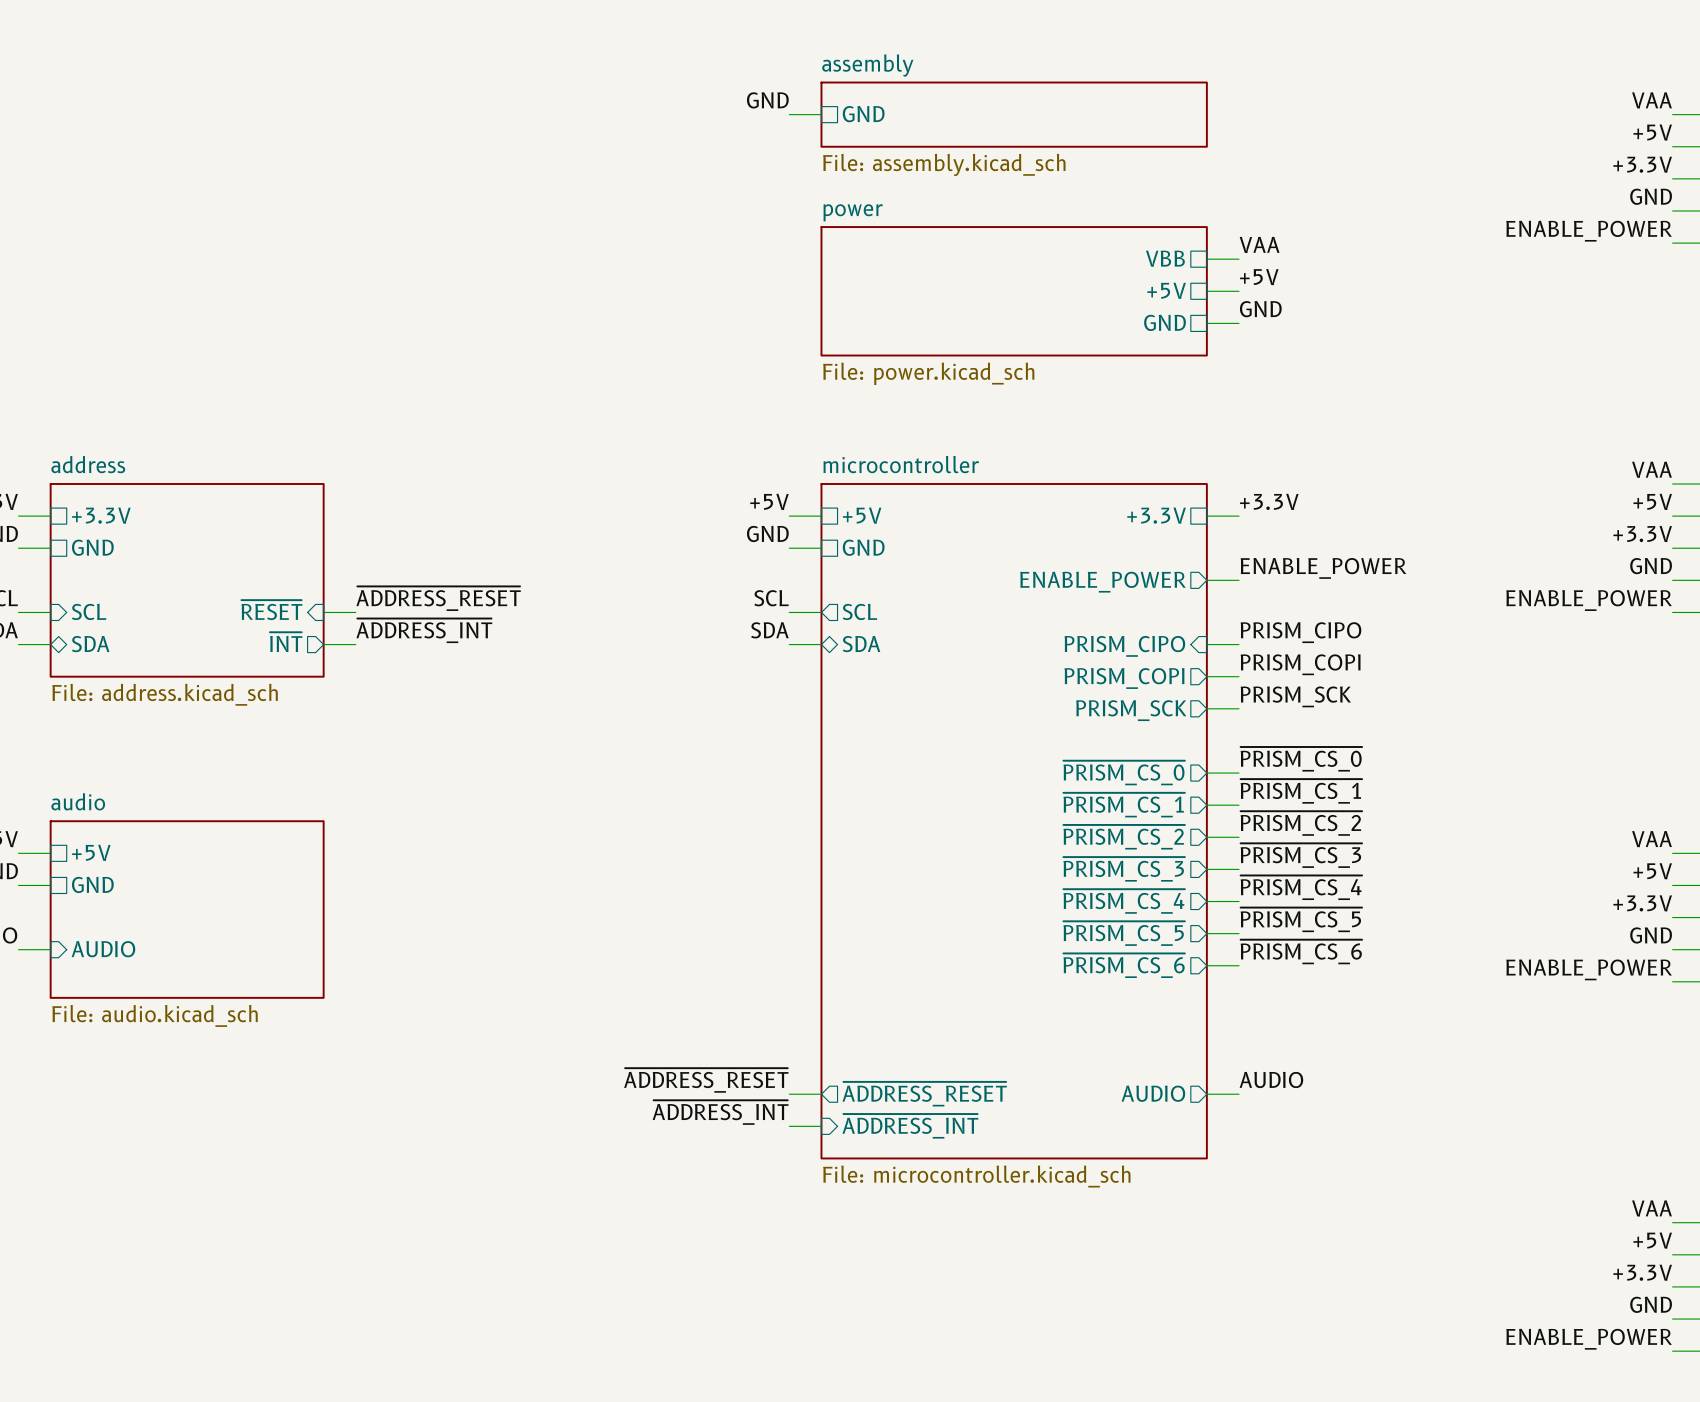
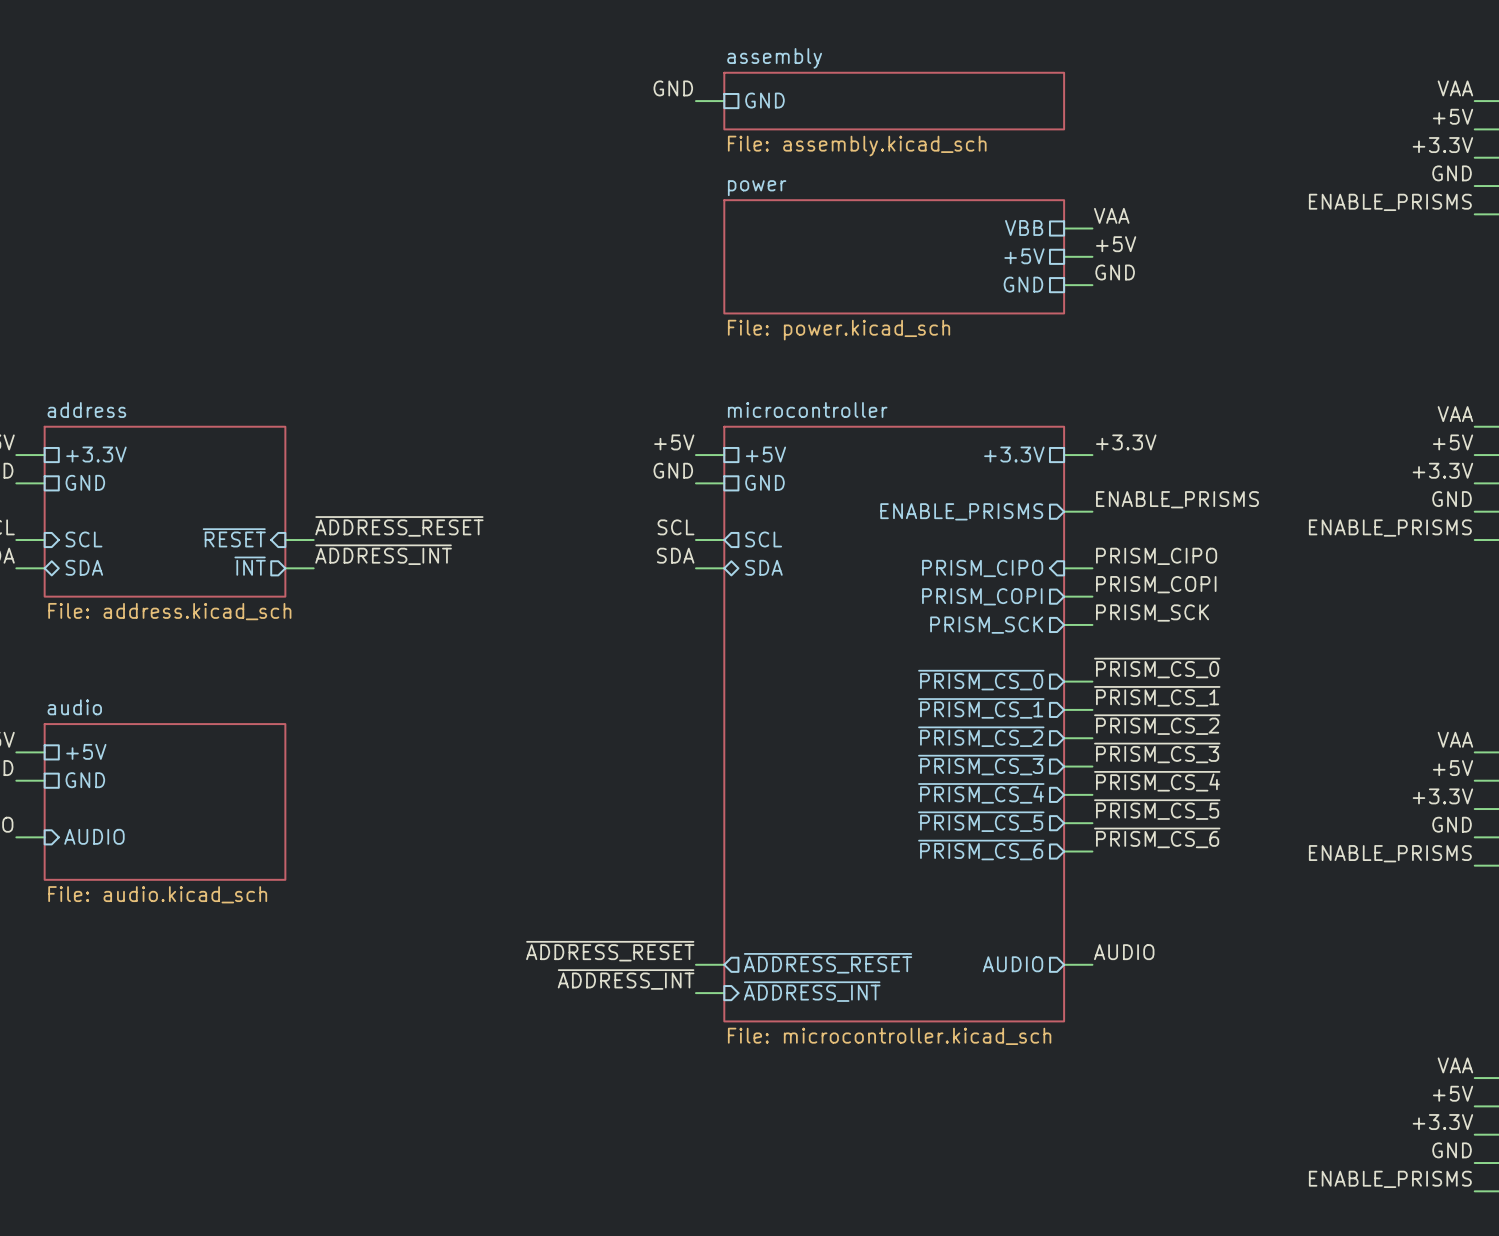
label: ENABLE_POWER (1589, 231) -> ENABLE_PRISMS (1390, 202)
label: ENABLE_POWER (1323, 568) -> ENABLE_PRISMS (1177, 499)
sheet pin: ENABLE_POWER (1102, 582) -> ENABLE_PRISMS (961, 511)
label: ENABLE_POWER (1589, 600) -> ENABLE_PRISMS (1390, 528)
label: ENABLE_POWER (1589, 969) -> ENABLE_PRISMS (1390, 853)
label: ENABLE_POWER (1589, 1339) -> ENABLE_PRISMS (1390, 1179)

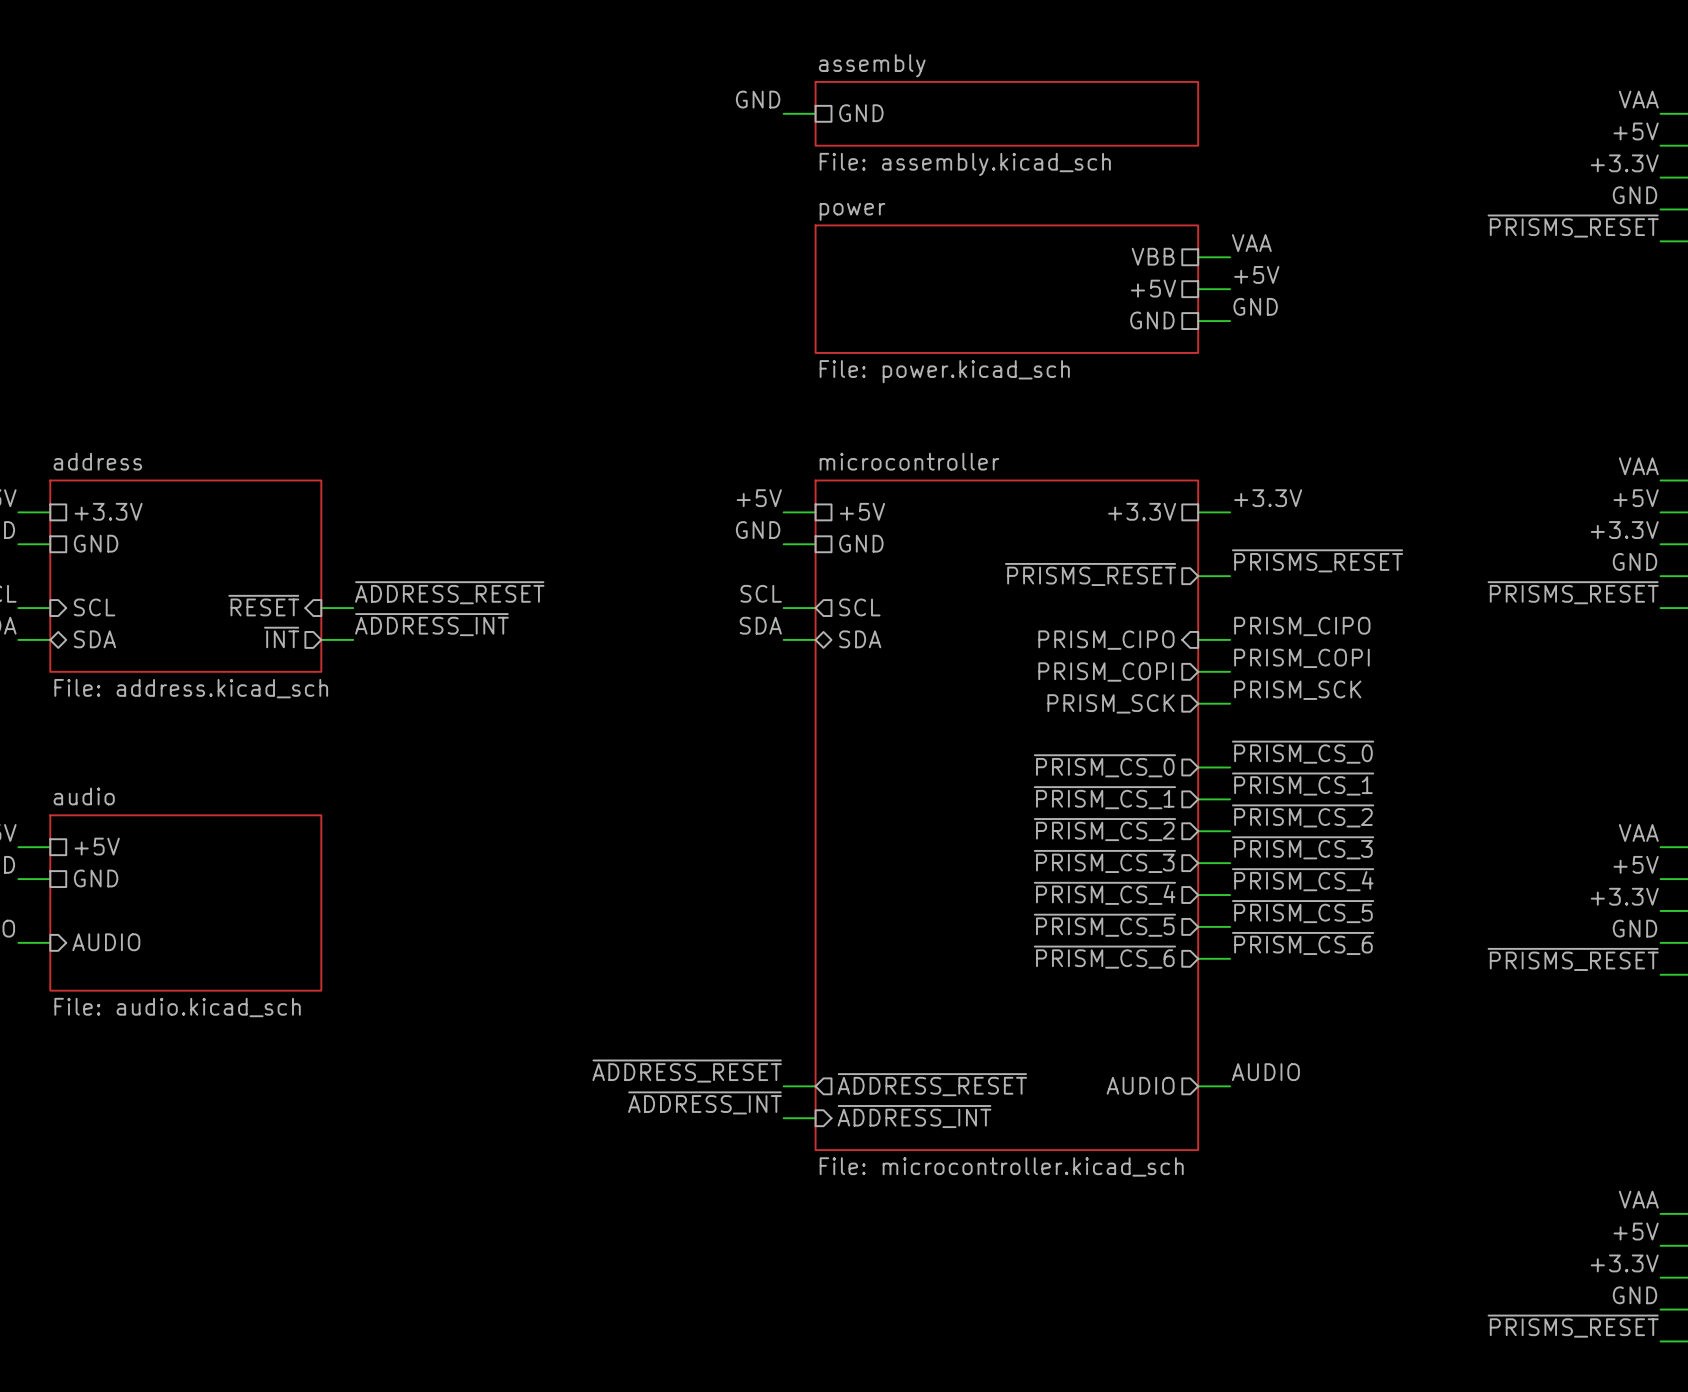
label: ENABLE_PRISMS (1390, 202) -> ~{PRISMS_RESET} (1573, 226)
label: ENABLE_PRISMS (1177, 499) -> ~{PRISMS_RESET} (1317, 560)
sheet pin: ENABLE_PRISMS (961, 511) -> ~{PRISMS_RESET} (1090, 574)
label: ENABLE_PRISMS (1390, 528) -> ~{PRISMS_RESET} (1573, 592)
label: ENABLE_PRISMS (1390, 853) -> ~{PRISMS_RESET} (1573, 959)
label: ENABLE_PRISMS (1390, 1179) -> ~{PRISMS_RESET} (1573, 1326)

